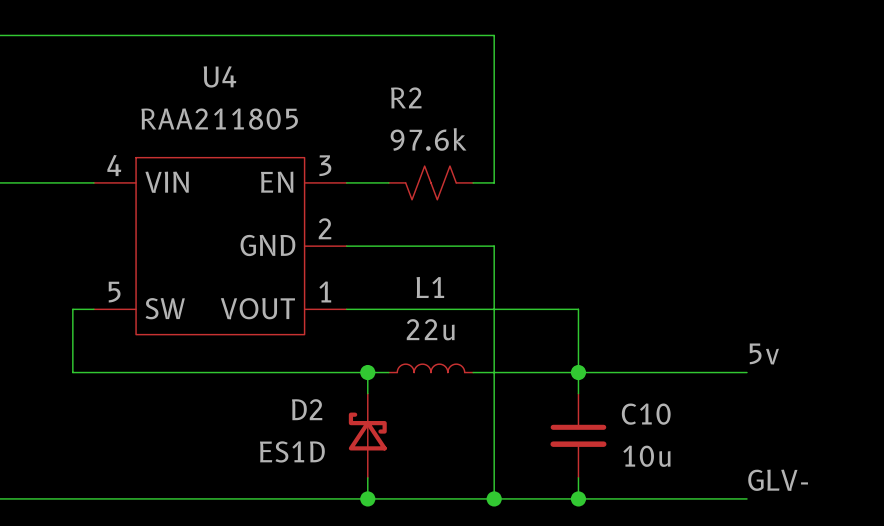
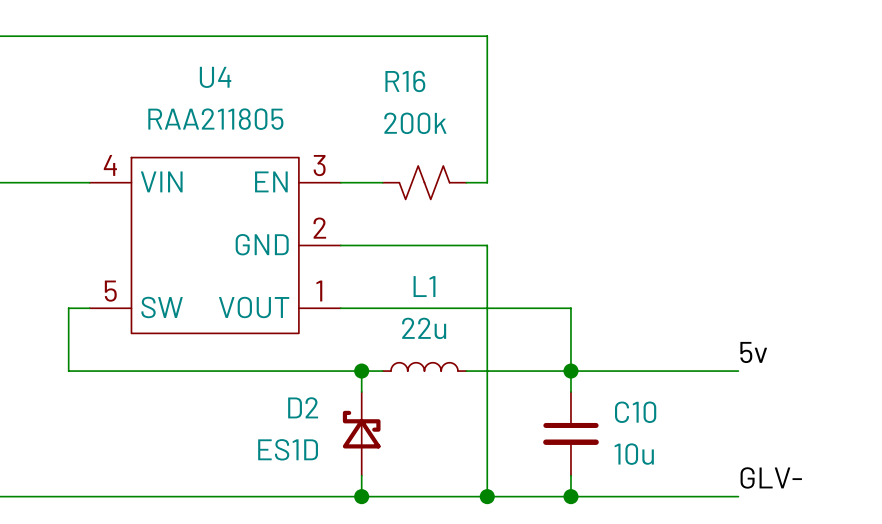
R2 name: R2 (406, 97) -> R16 (405, 81)
R2 value: 97.6k (428, 139) -> 200k (415, 123)

